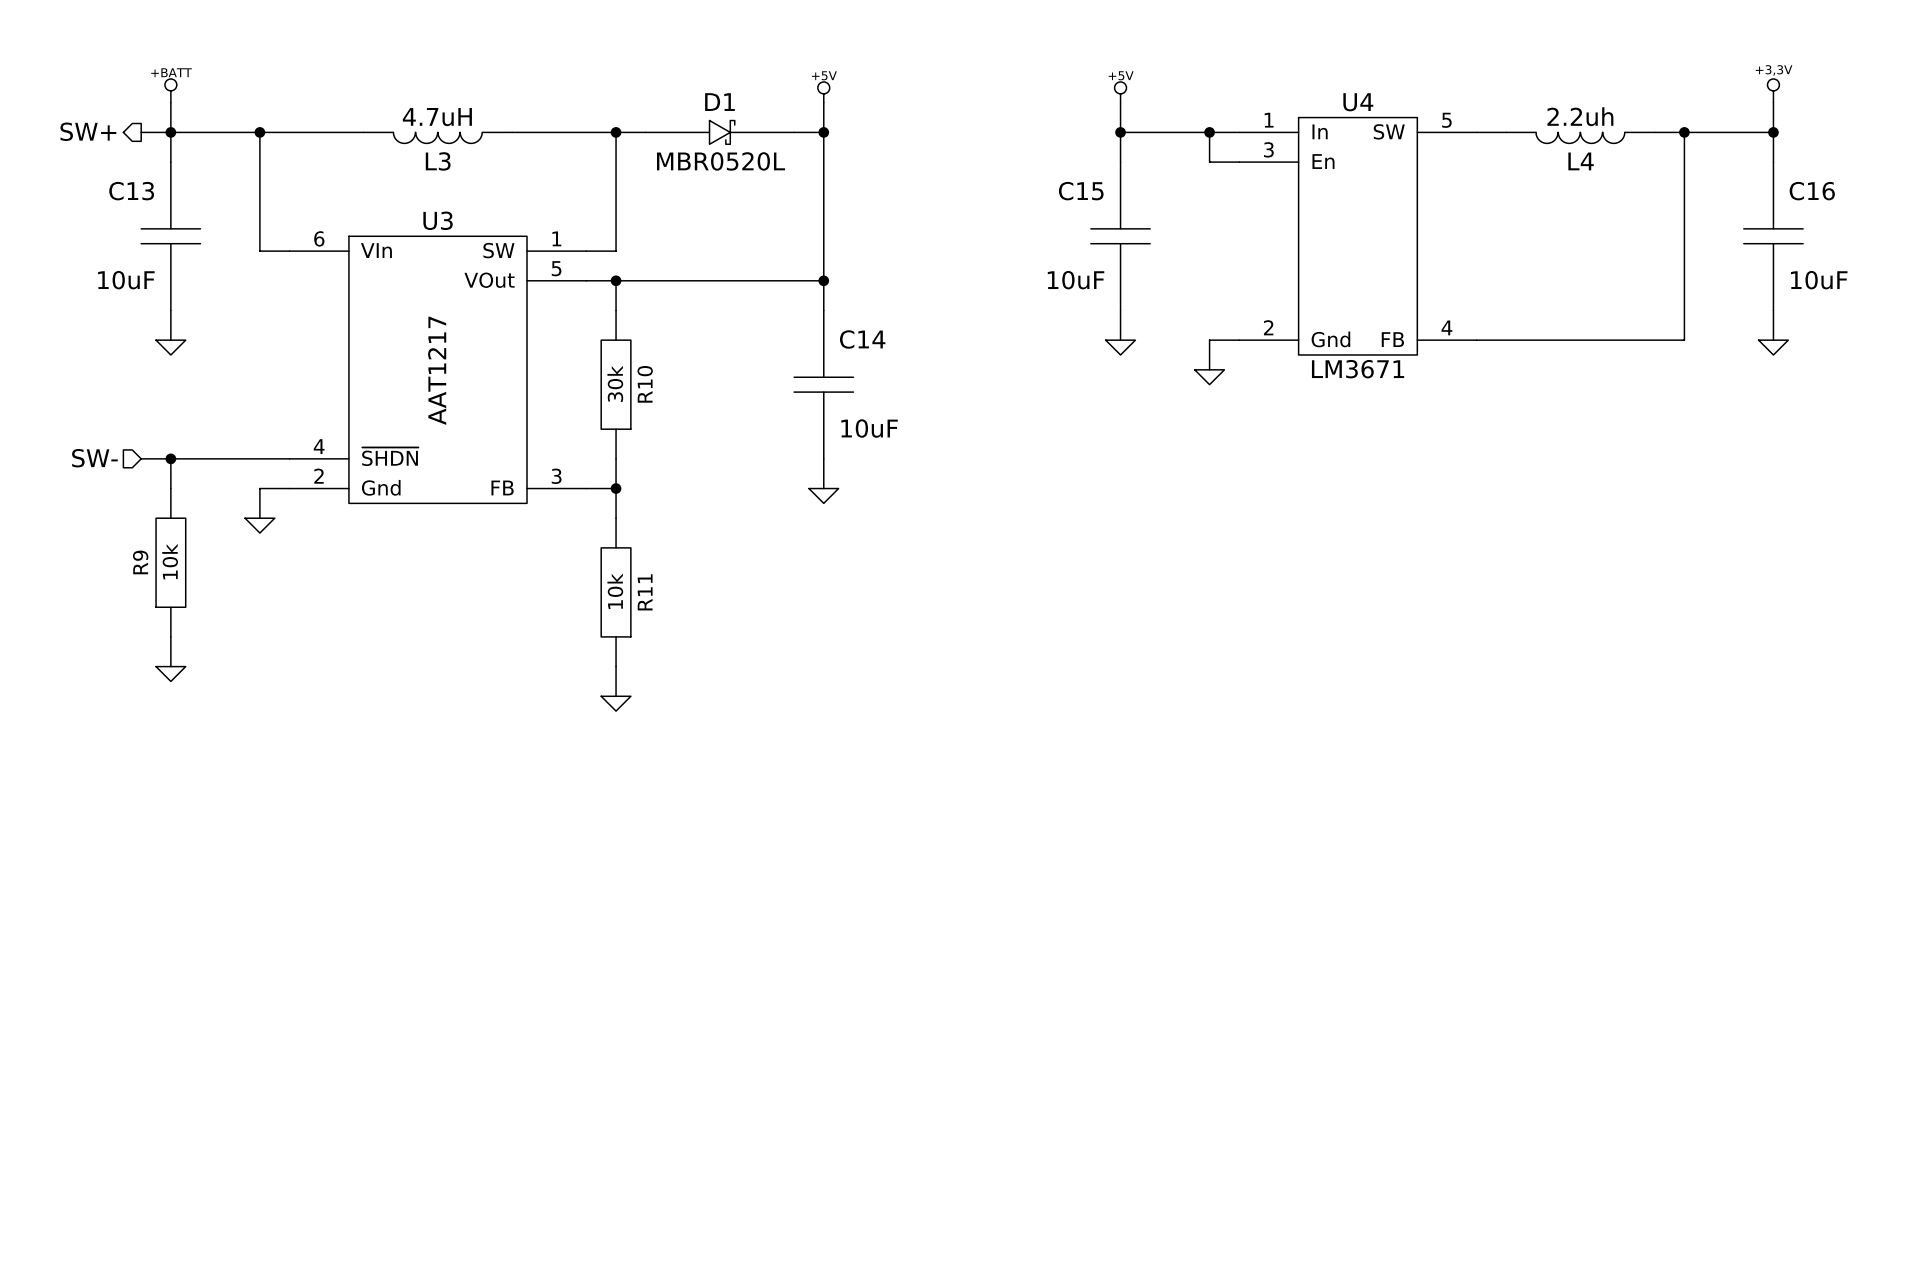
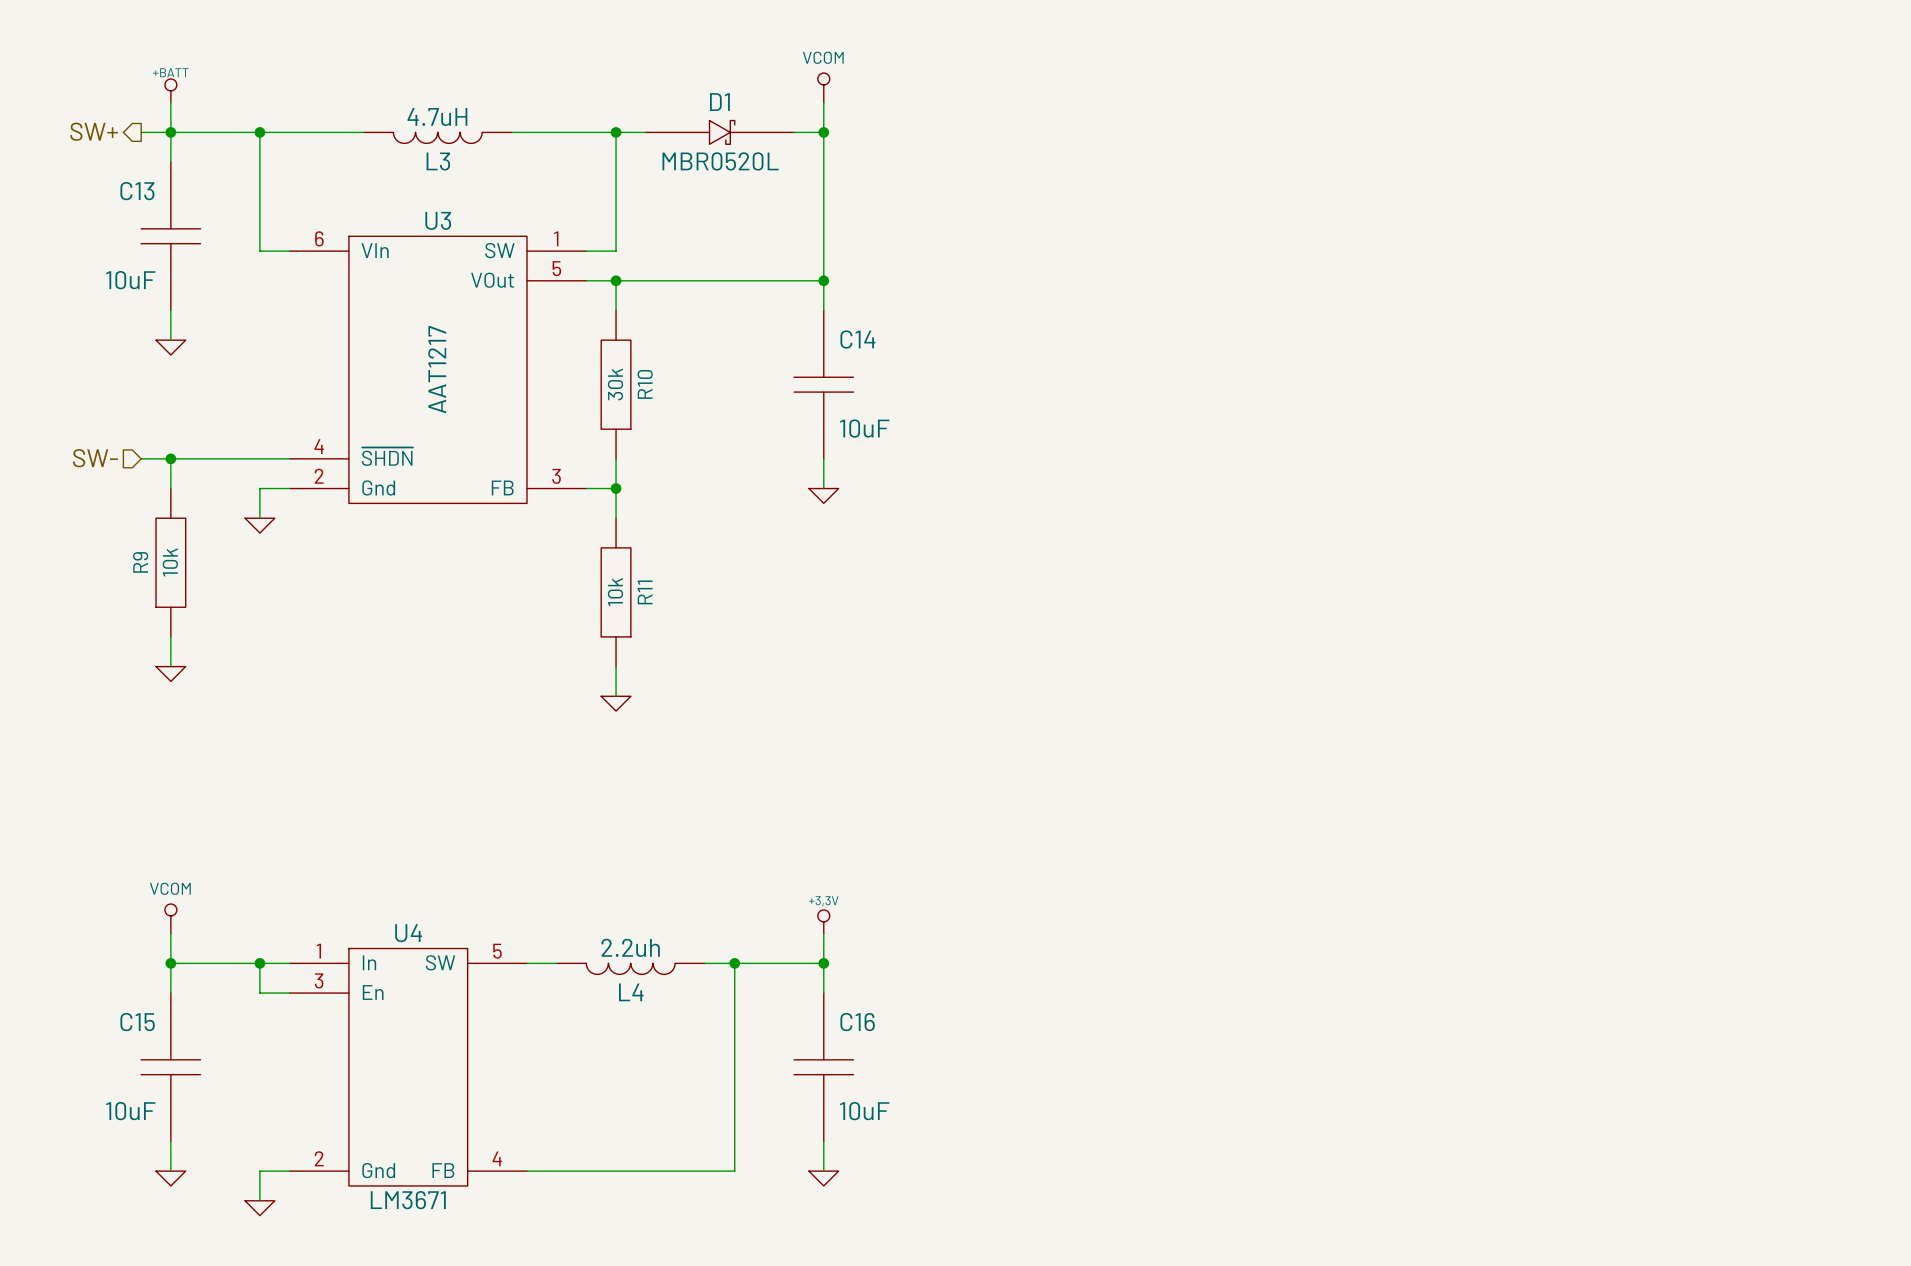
power symbol: +3,3V (1773, 90) -> none
power symbol: +5V (823, 92) -> VCOM (823, 87)
power symbol: +5V (1120, 92) -> none
wire: (1120, 102) (1120, 162) -> none
wire: (1773, 102) (1773, 162) -> none
wire: (1120, 132) (1239, 132) -> none
junction: (1120, 132) -> none
wire: (1209, 132) (1209, 162) (1239, 162) -> none
junction: (1209, 132) -> none
wire: (1476, 132) (1506, 132) -> none
wire: (1654, 132) (1773, 132) -> none
wire: (1684, 132) (1684, 340) (1476, 340) -> none
junction: (1684, 132) -> none
junction: (1773, 132) -> none
L4 position: (1580, 137) -> (630, 968)
C15 position: (1120, 236) -> (170, 1067)
U4 position: (1357, 236) -> (408, 1067)
C16 position: (1773, 236) -> (823, 1067)
wire: (1120, 310) (1120, 340) -> none
wire: (1773, 310) (1773, 340) -> none
wire: (1239, 340) (1209, 340) (1209, 369) -> none
power symbol: (1120, 347) -> none
power symbol: (1773, 347) -> none
power symbol: (1209, 377) -> none
power symbol: none -> VCOM (170, 918)
power symbol: none -> +3,3V (823, 921)
wire: none -> (170, 933) (170, 993)
wire: none -> (823, 933) (823, 993)
wire: none -> (170, 963) (289, 963)
junction: none -> (170, 963)
wire: none -> (259, 963) (259, 993) (289, 993)
junction: none -> (259, 963)
wire: none -> (527, 963) (556, 963)
wire: none -> (705, 963) (823, 963)
wire: none -> (734, 963) (734, 1171) (527, 1171)
junction: none -> (734, 963)
junction: none -> (823, 963)
wire: none -> (170, 1141) (170, 1171)
wire: none -> (823, 1141) (823, 1171)
wire: none -> (289, 1171) (259, 1171) (259, 1200)
power symbol: none -> (170, 1178)
power symbol: none -> (823, 1178)
power symbol: none -> (259, 1208)

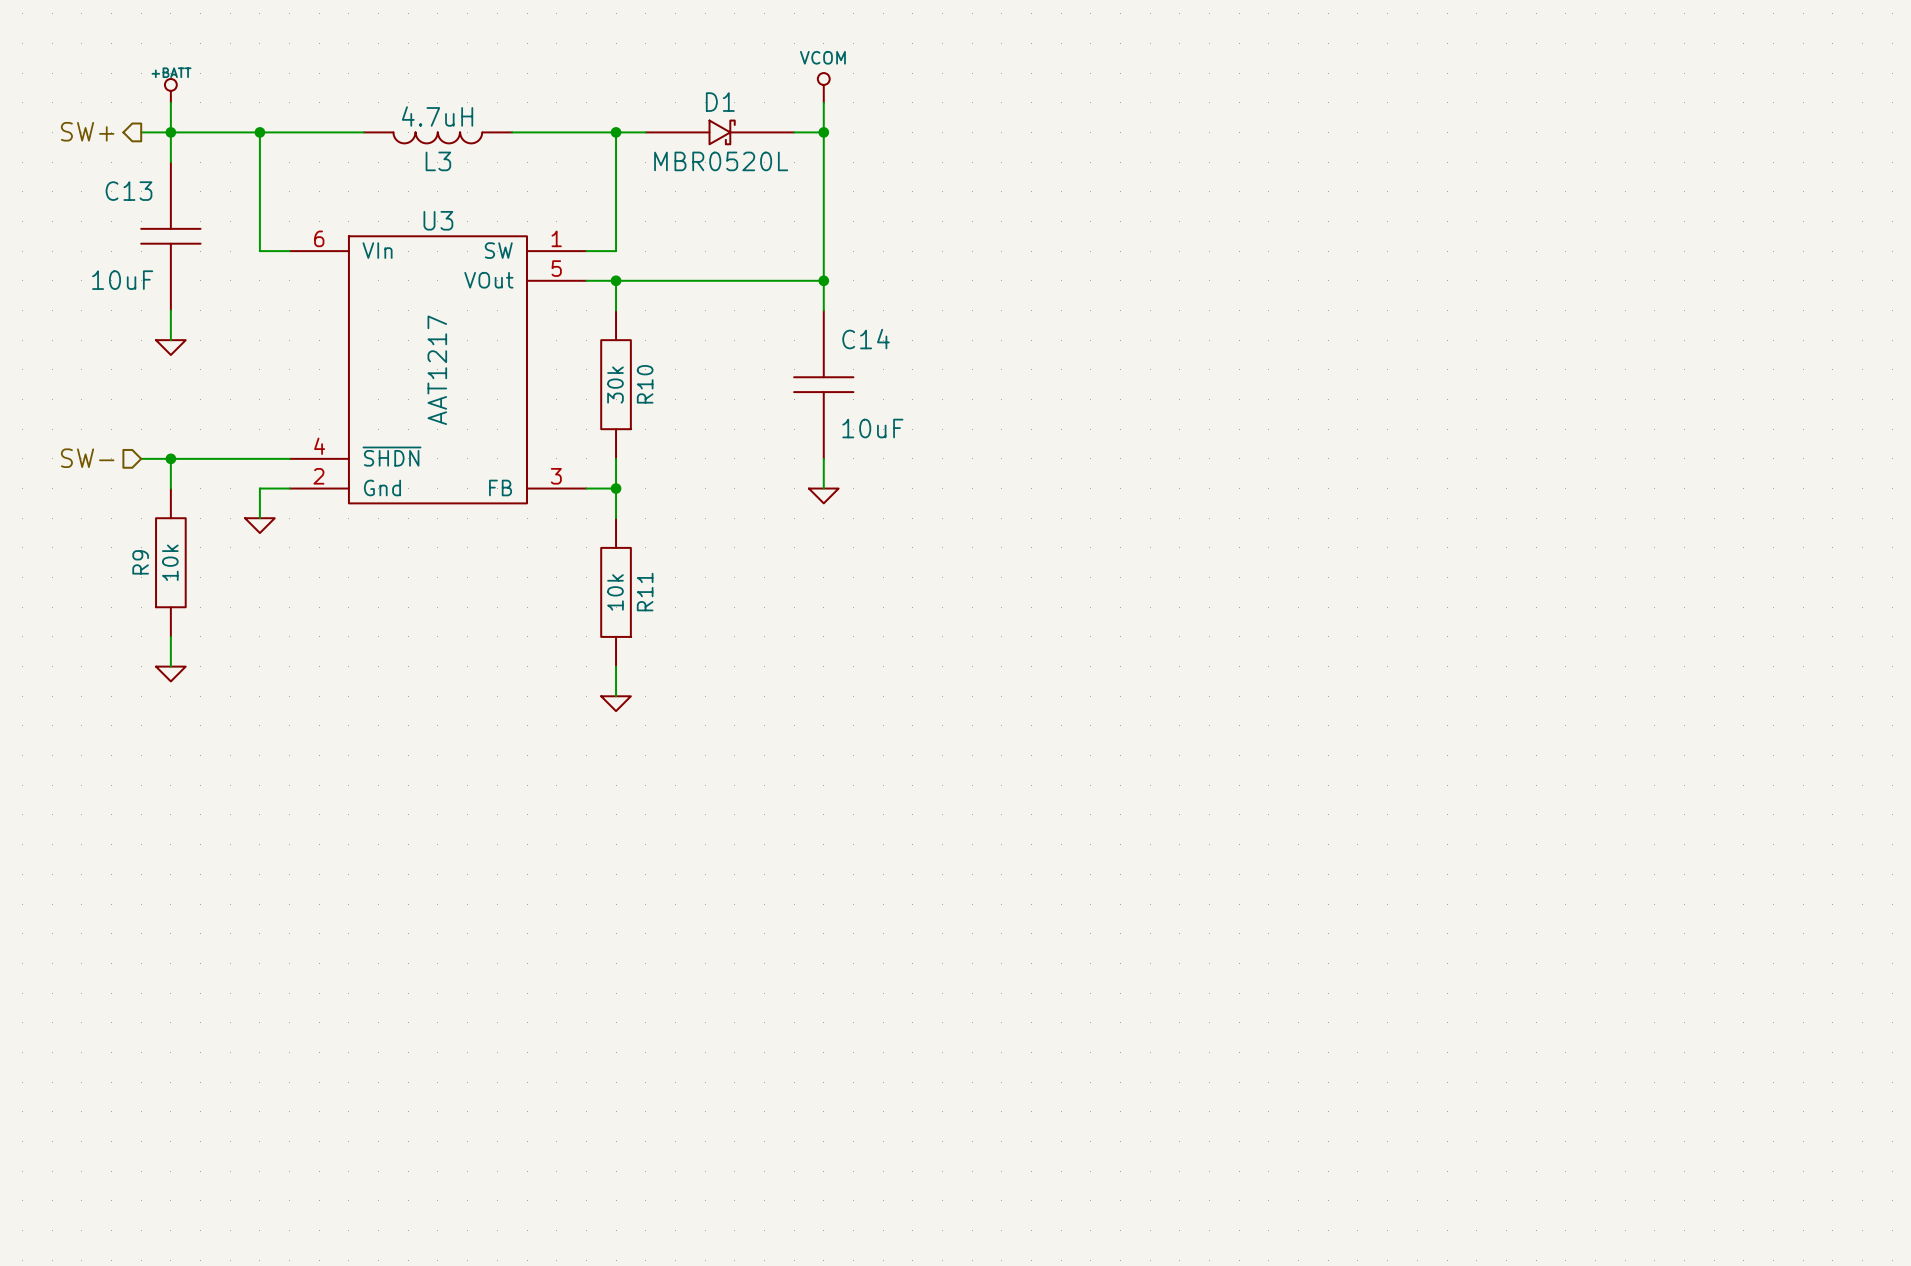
power symbol: VCOM (170, 918) -> none
power symbol: +3,3V (823, 921) -> none
wire: (170, 933) (170, 993) -> none
wire: (823, 933) (823, 993) -> none
wire: (170, 963) (289, 963) -> none
junction: (170, 963) -> none
wire: (259, 963) (259, 993) (289, 993) -> none
junction: (259, 963) -> none
wire: (527, 963) (556, 963) -> none
wire: (705, 963) (823, 963) -> none
wire: (734, 963) (734, 1171) (527, 1171) -> none
junction: (734, 963) -> none
junction: (823, 963) -> none
L4: 2.2uh (630, 968) -> none
C15: 10uF (170, 1067) -> none
U4: LM3671 (408, 1067) -> none
C16: 10uF (823, 1067) -> none
wire: (170, 1141) (170, 1171) -> none
wire: (823, 1141) (823, 1171) -> none
wire: (289, 1171) (259, 1171) (259, 1200) -> none
power symbol: (170, 1178) -> none
power symbol: (823, 1178) -> none
power symbol: (259, 1208) -> none

